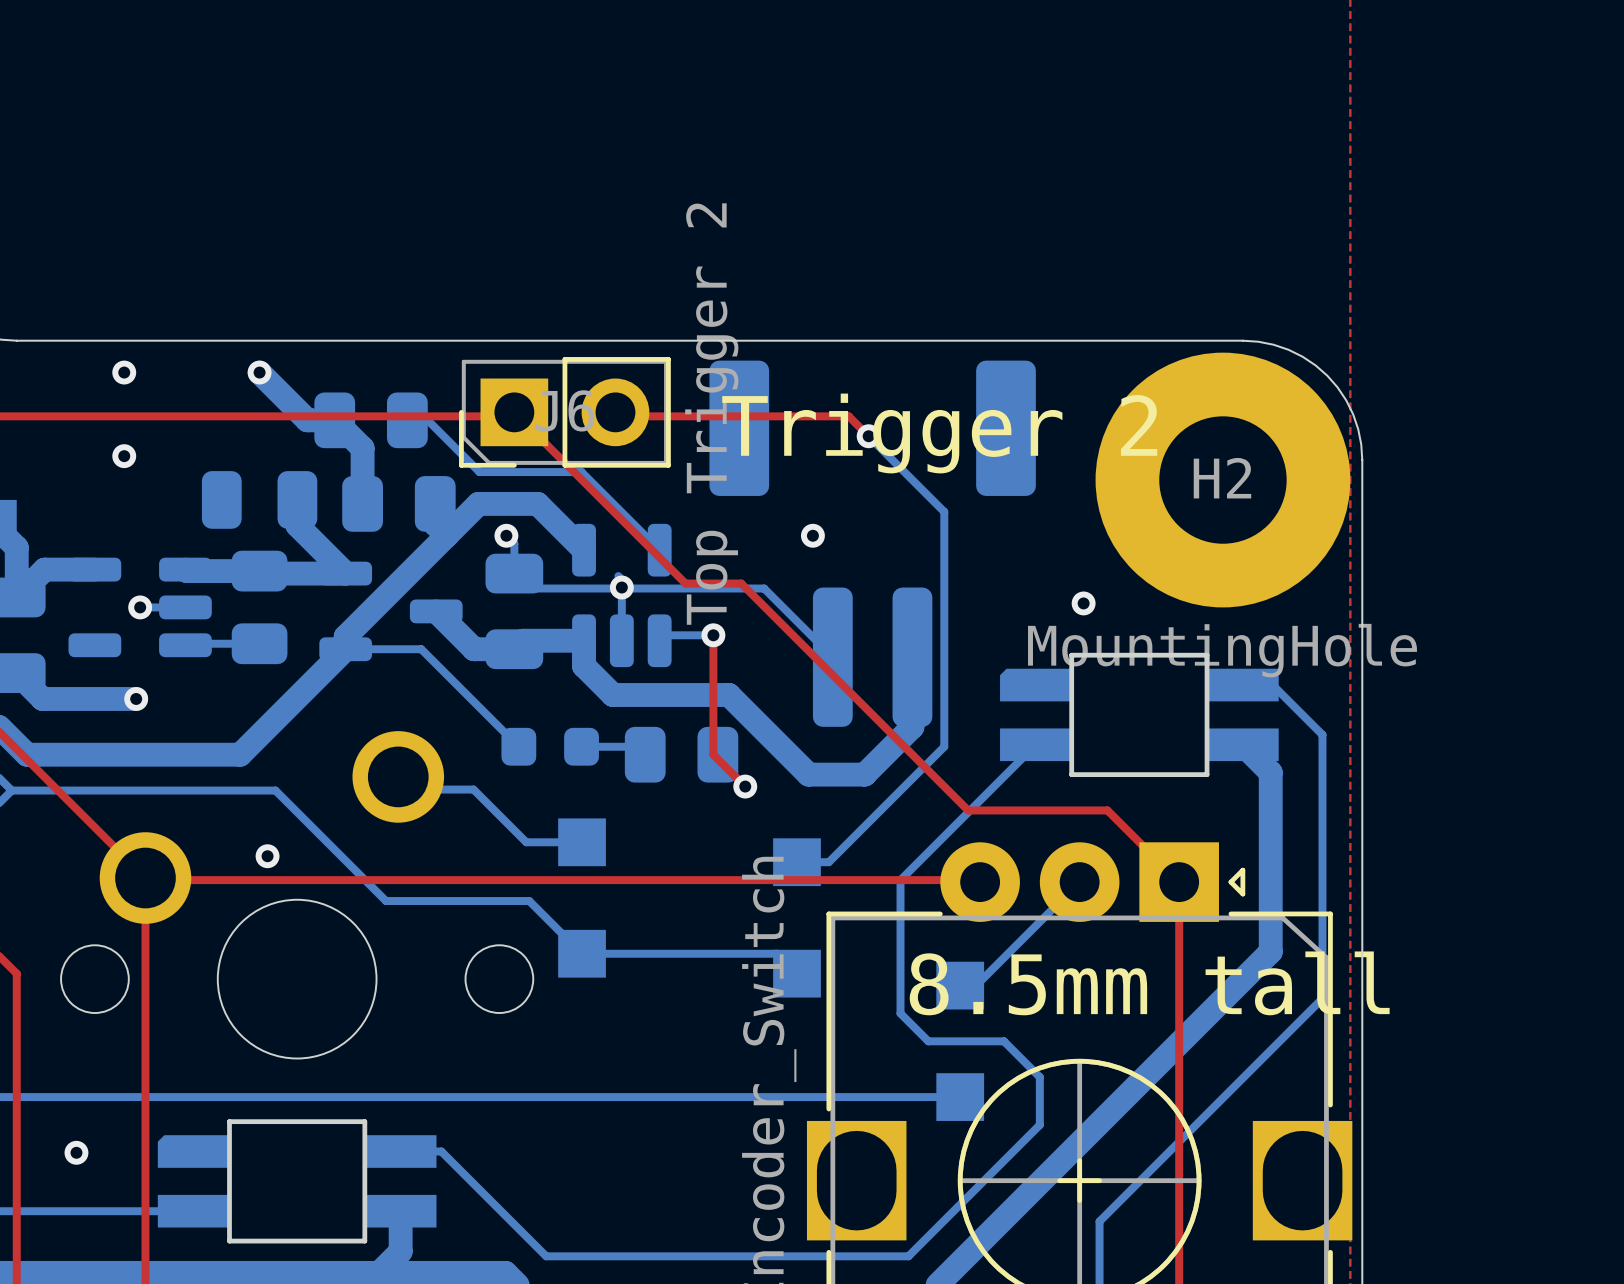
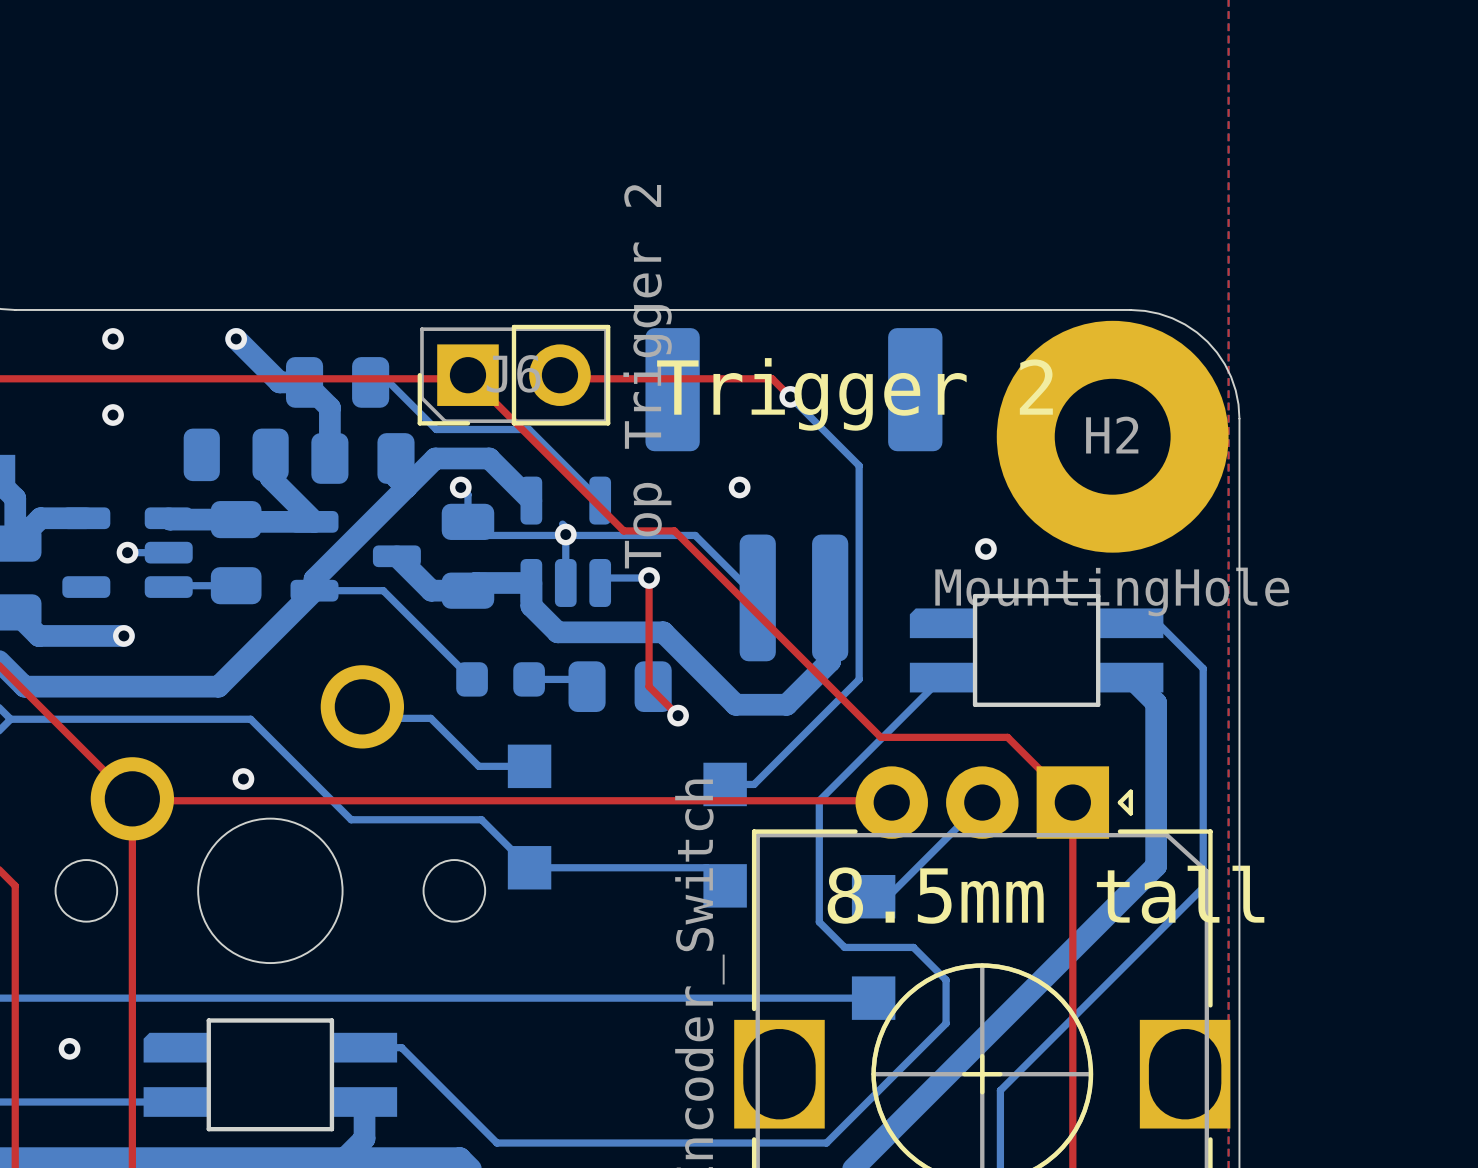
bottom track: (1322, 975) (1322, 998) (1099, 1221) -> (1203, 887) (1000, 1090) (1000, 1111)

